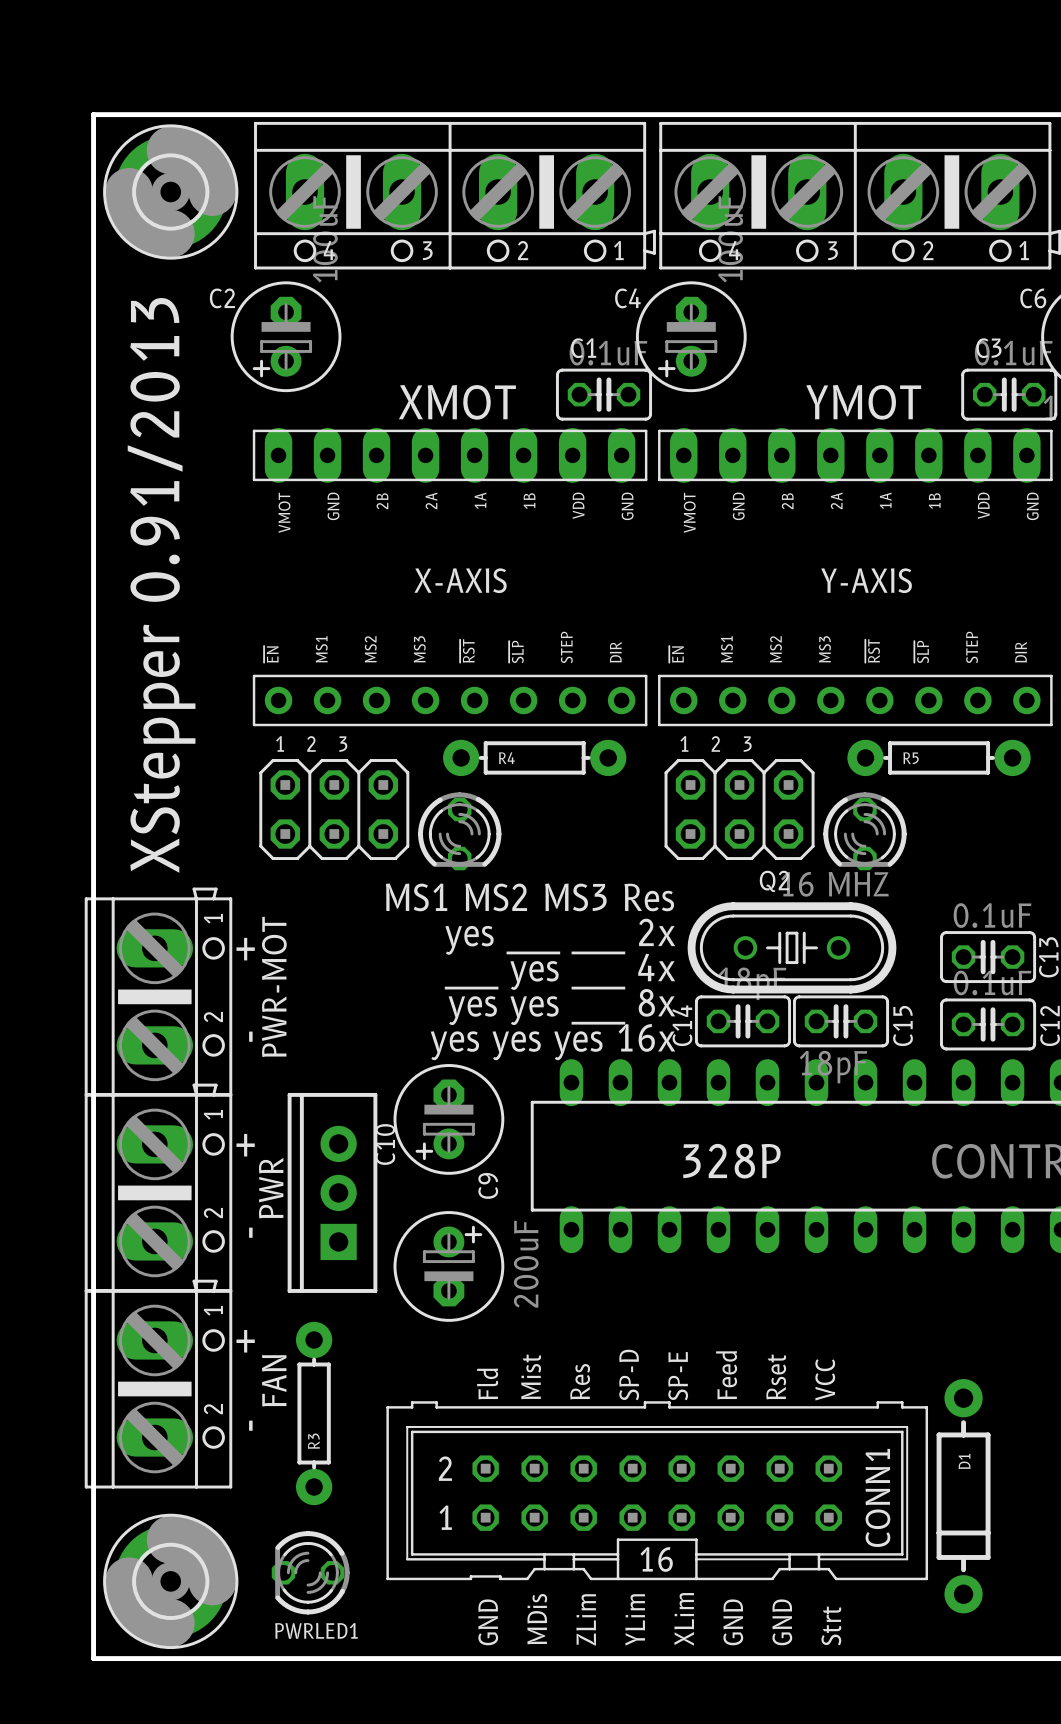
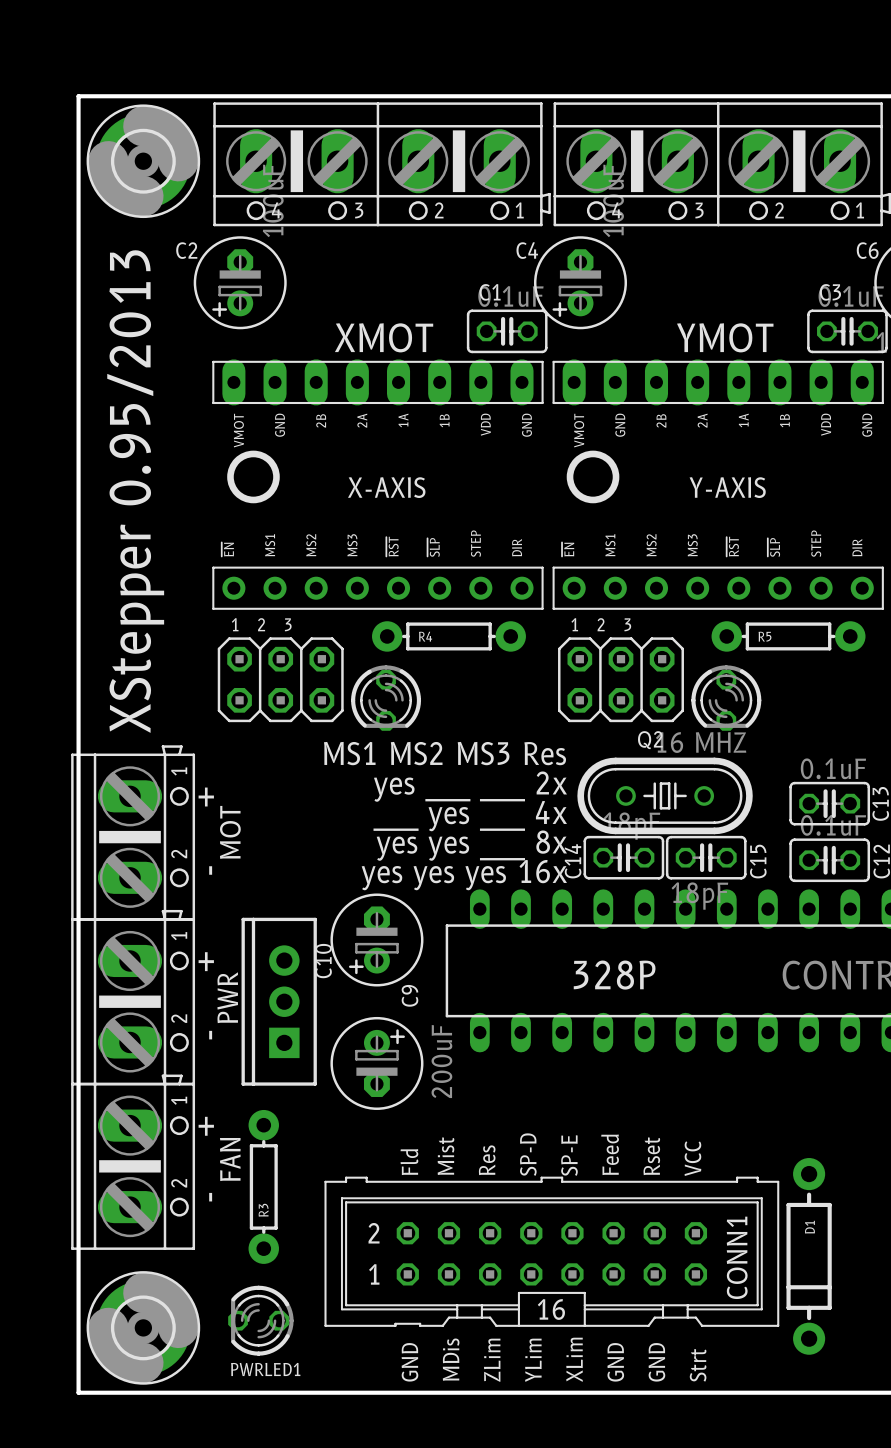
drawing: none -> [227, 450, 280, 504]
drawing: none -> [566, 450, 620, 504]
text: XStepper 0.91/2013 (161, 585) -> XStepper 0.95/2013 (135, 491)
PWR-MOT name: PWR-MOT (274, 986) -> MOT (230, 832)

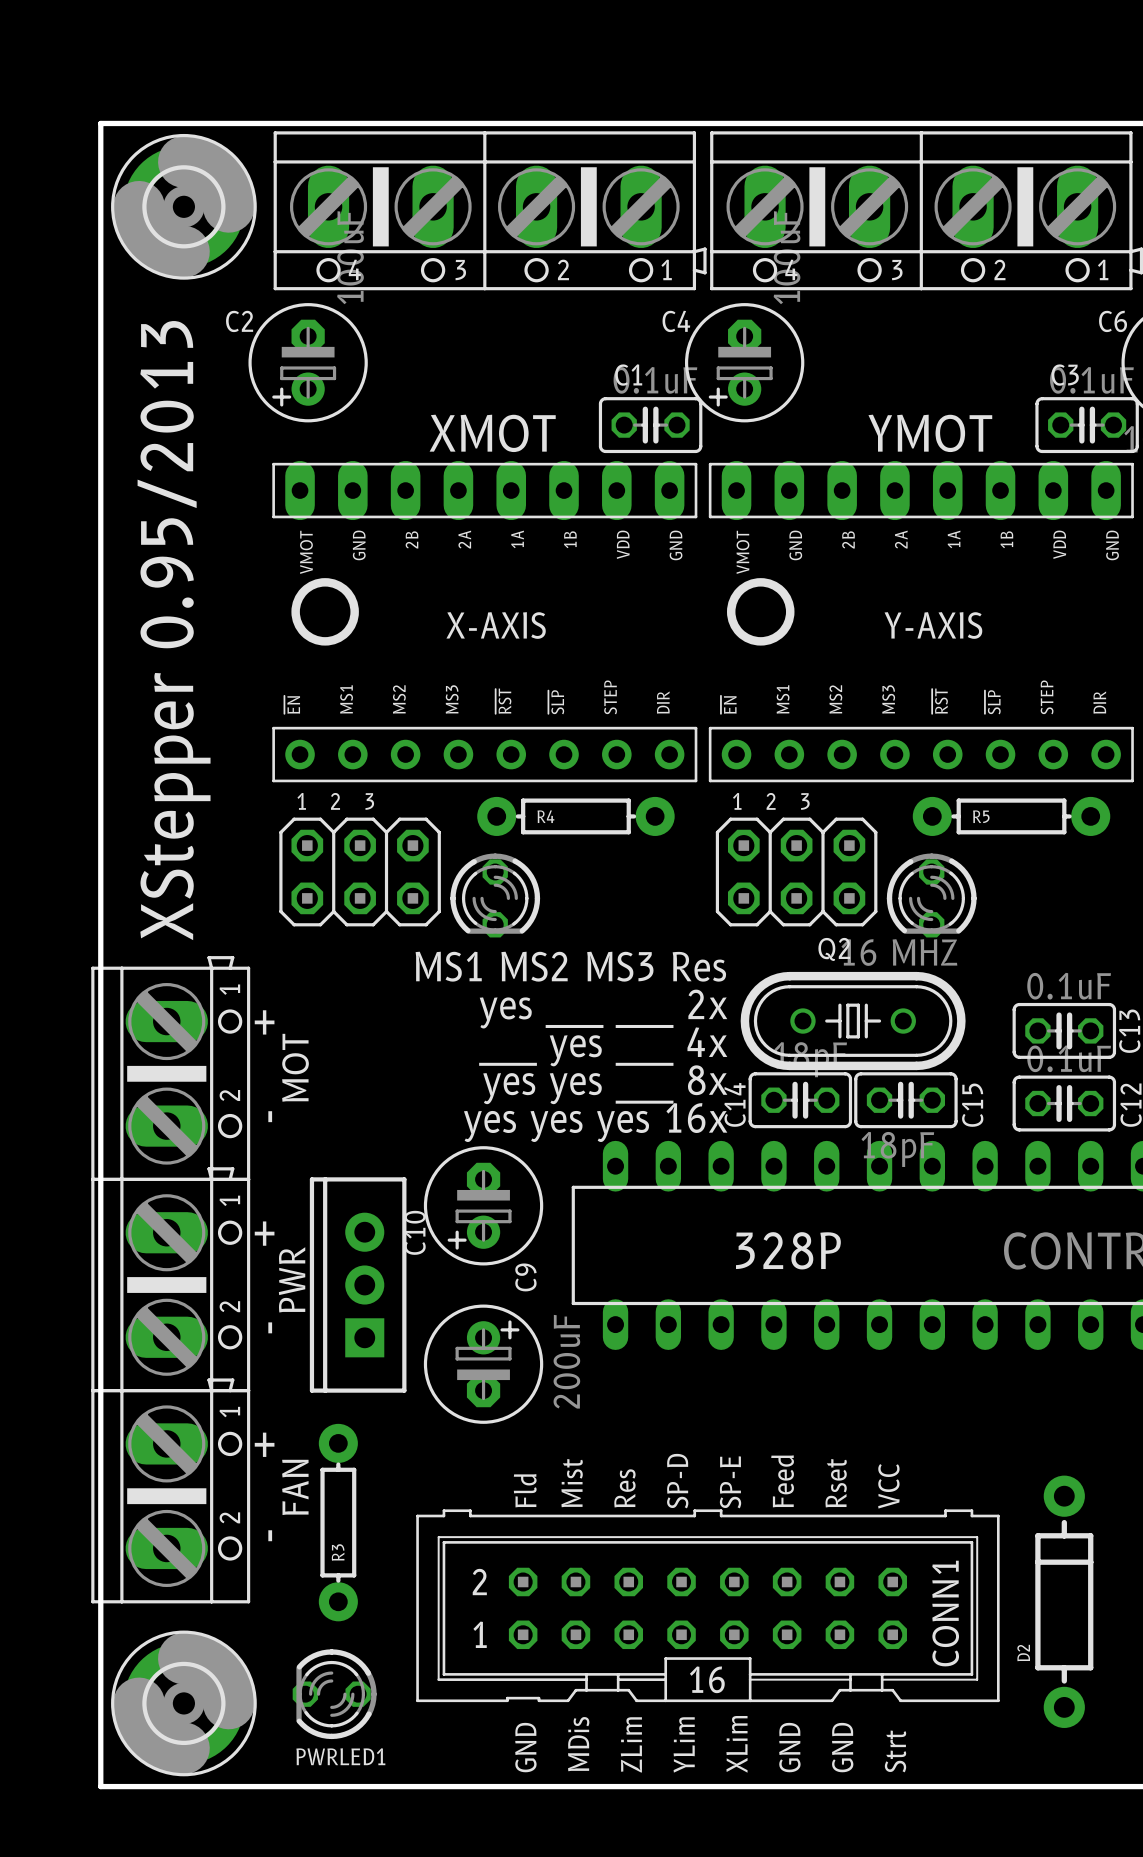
D2: none -> (1064, 1601)
D1: (809, 1256) -> none

